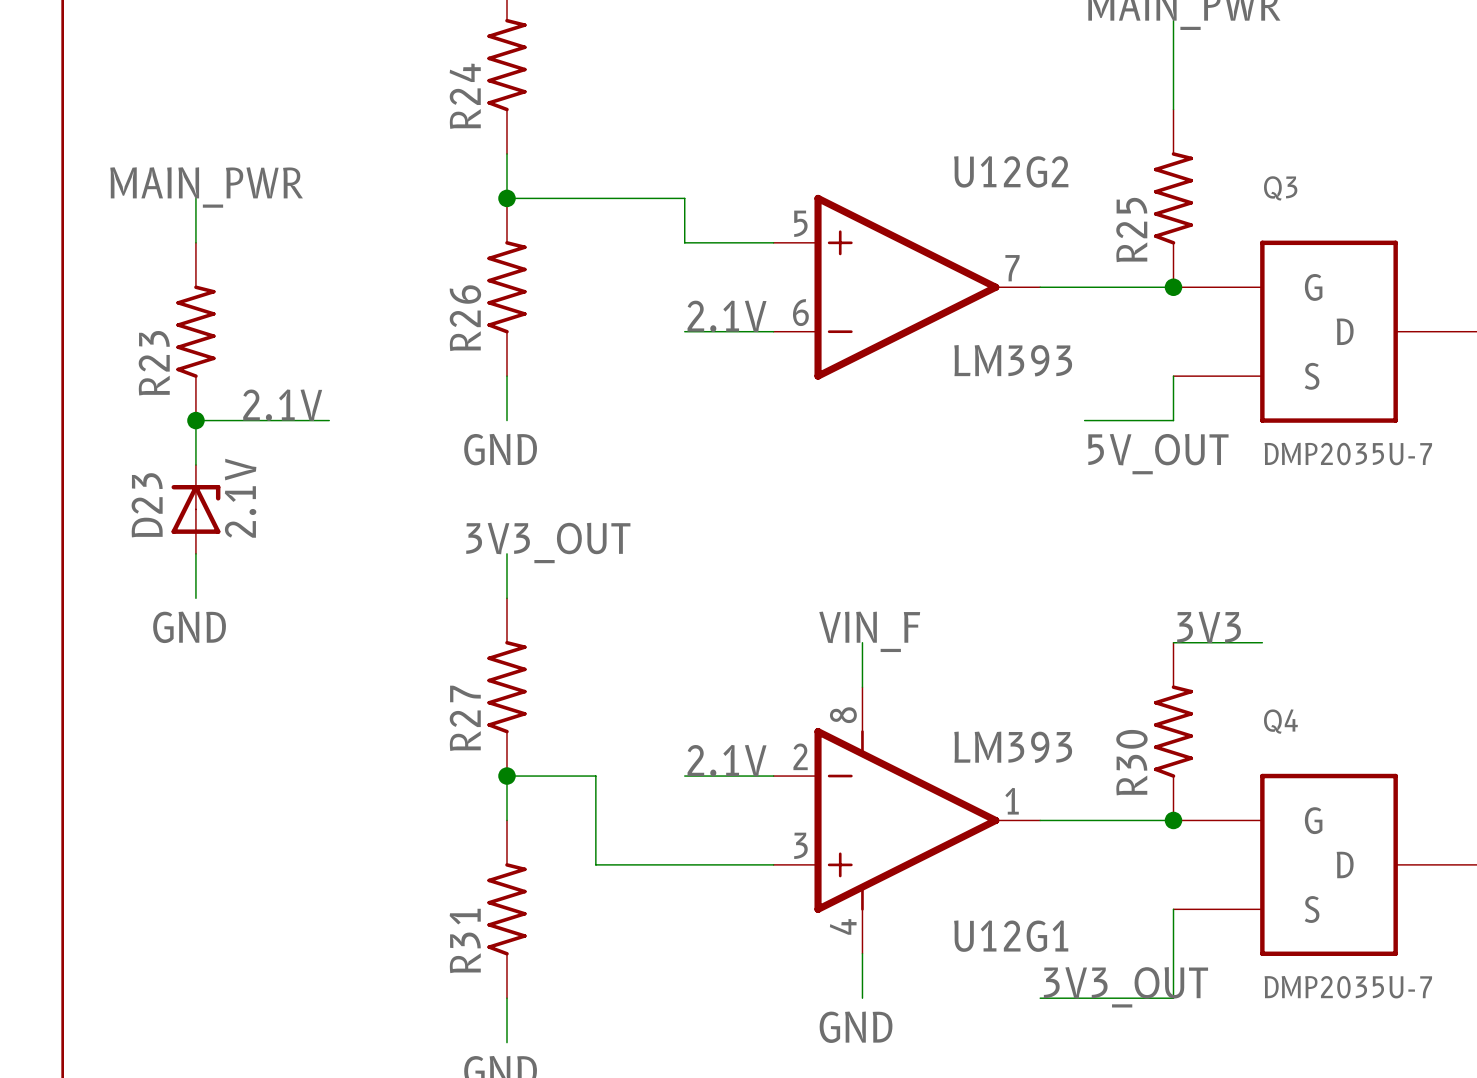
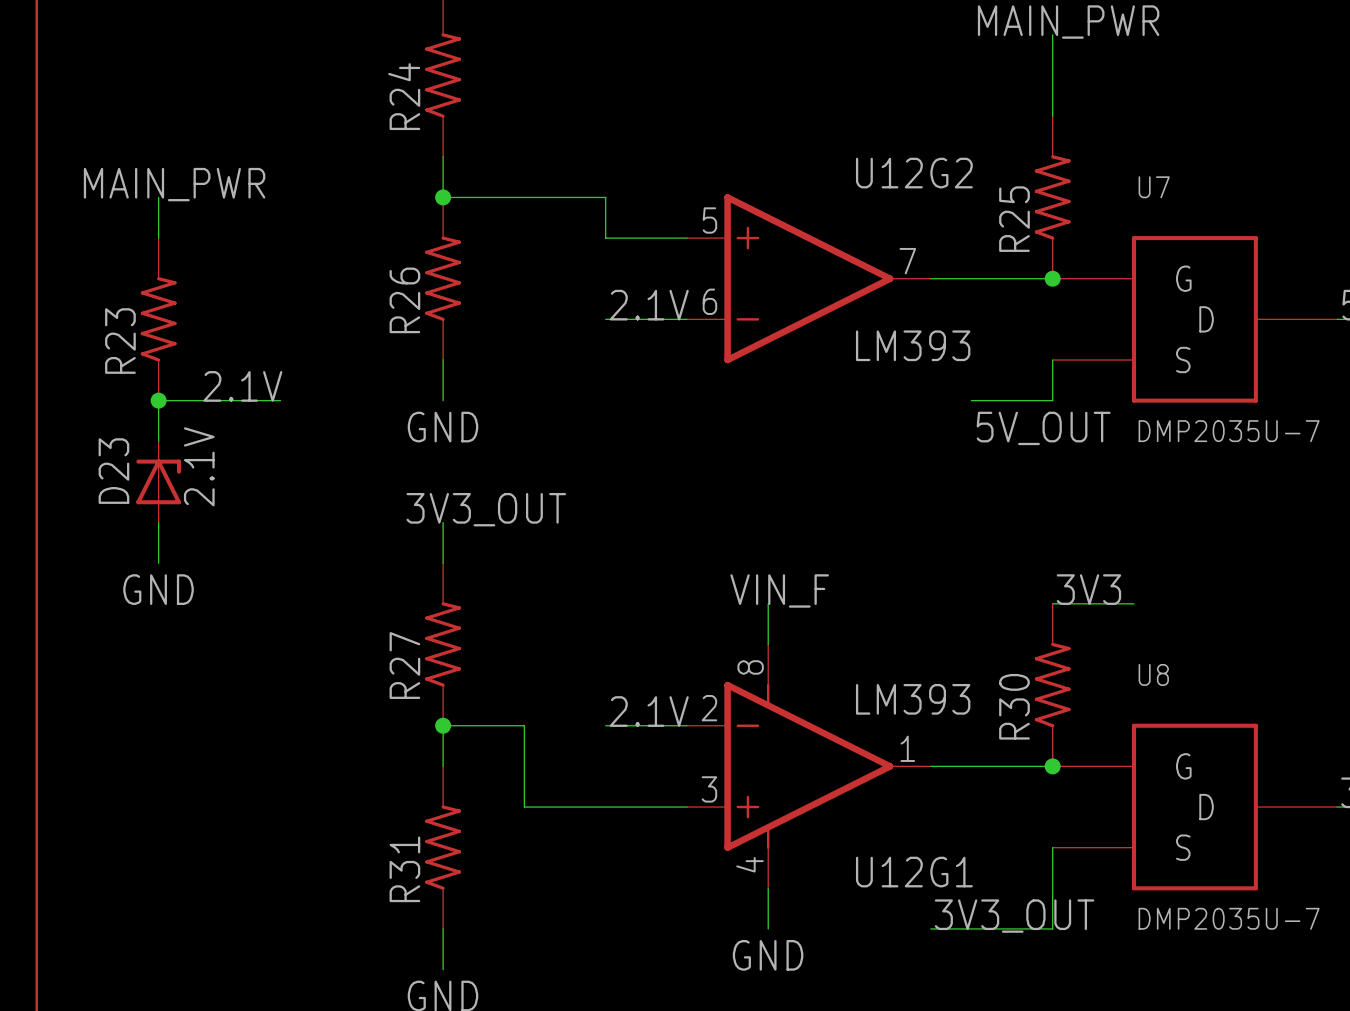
Q3 name: Q3 (1280, 188) -> U7 (1154, 187)
Q4 name: Q4 (1280, 721) -> U8 (1153, 674)

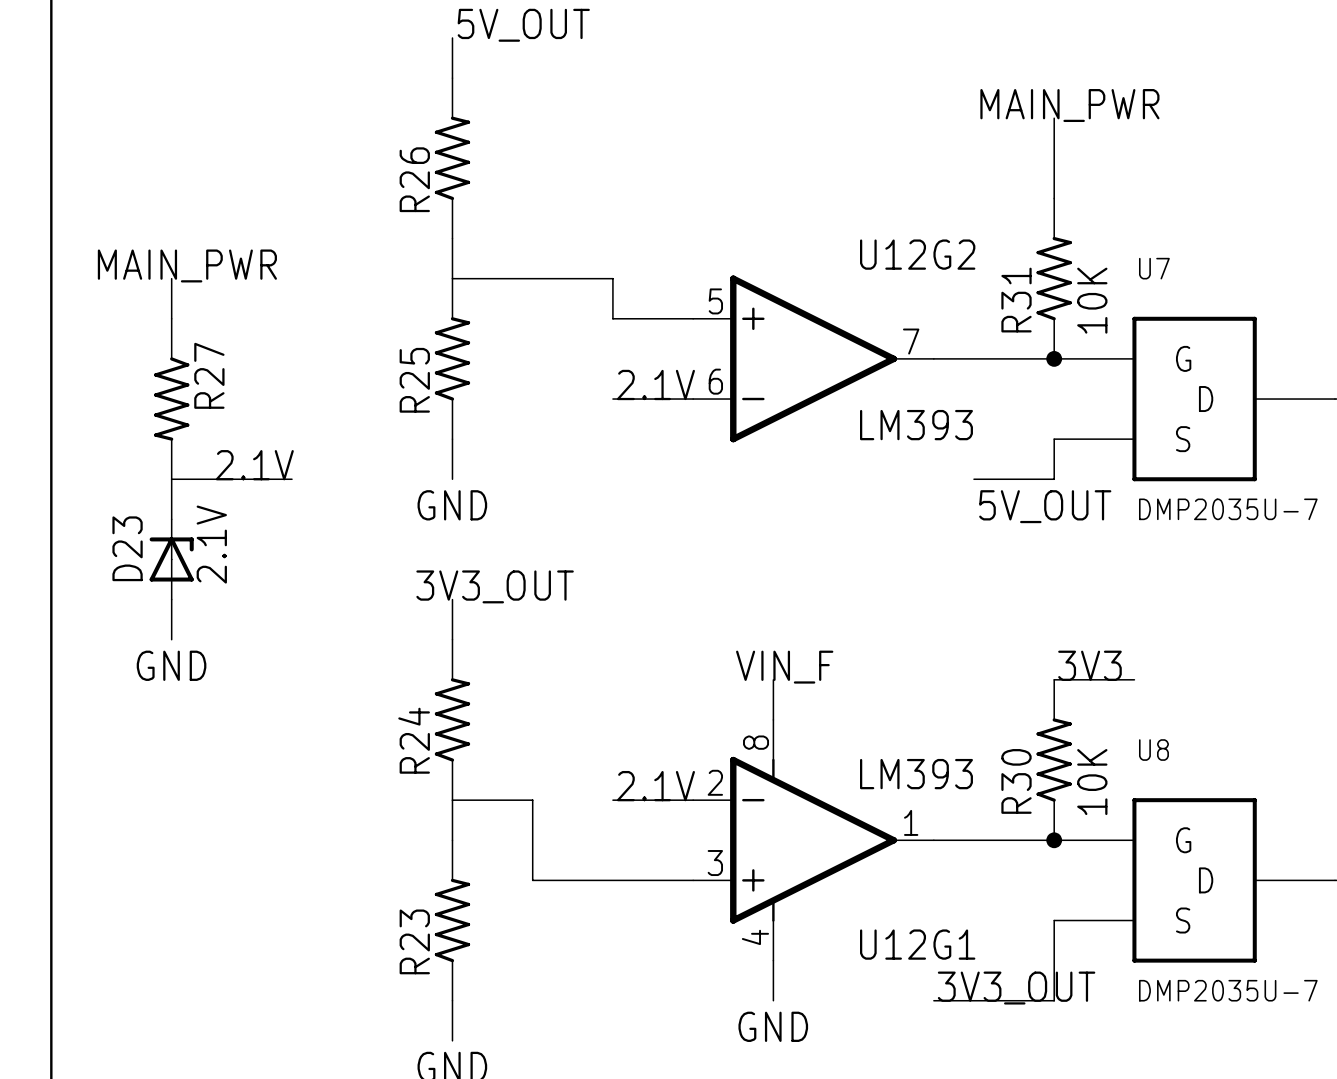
R24 name: R24 (404, 96) -> R26 (414, 179)
junction: (443, 197) -> none
R25 name: R25 (1014, 219) -> R31 (1016, 300)
R25 value: none -> 10K (1092, 300)
R26 name: R26 (404, 300) -> R25 (414, 380)
R23: (158, 319) -> none
R27: none -> (171, 399)
junction: (158, 400) -> none
R27 name: R27 (404, 665) -> R24 (414, 740)
R30 value: none -> 10K (1092, 782)
junction: (443, 725) -> none
R31 name: R31 (404, 869) -> R23 (414, 941)

